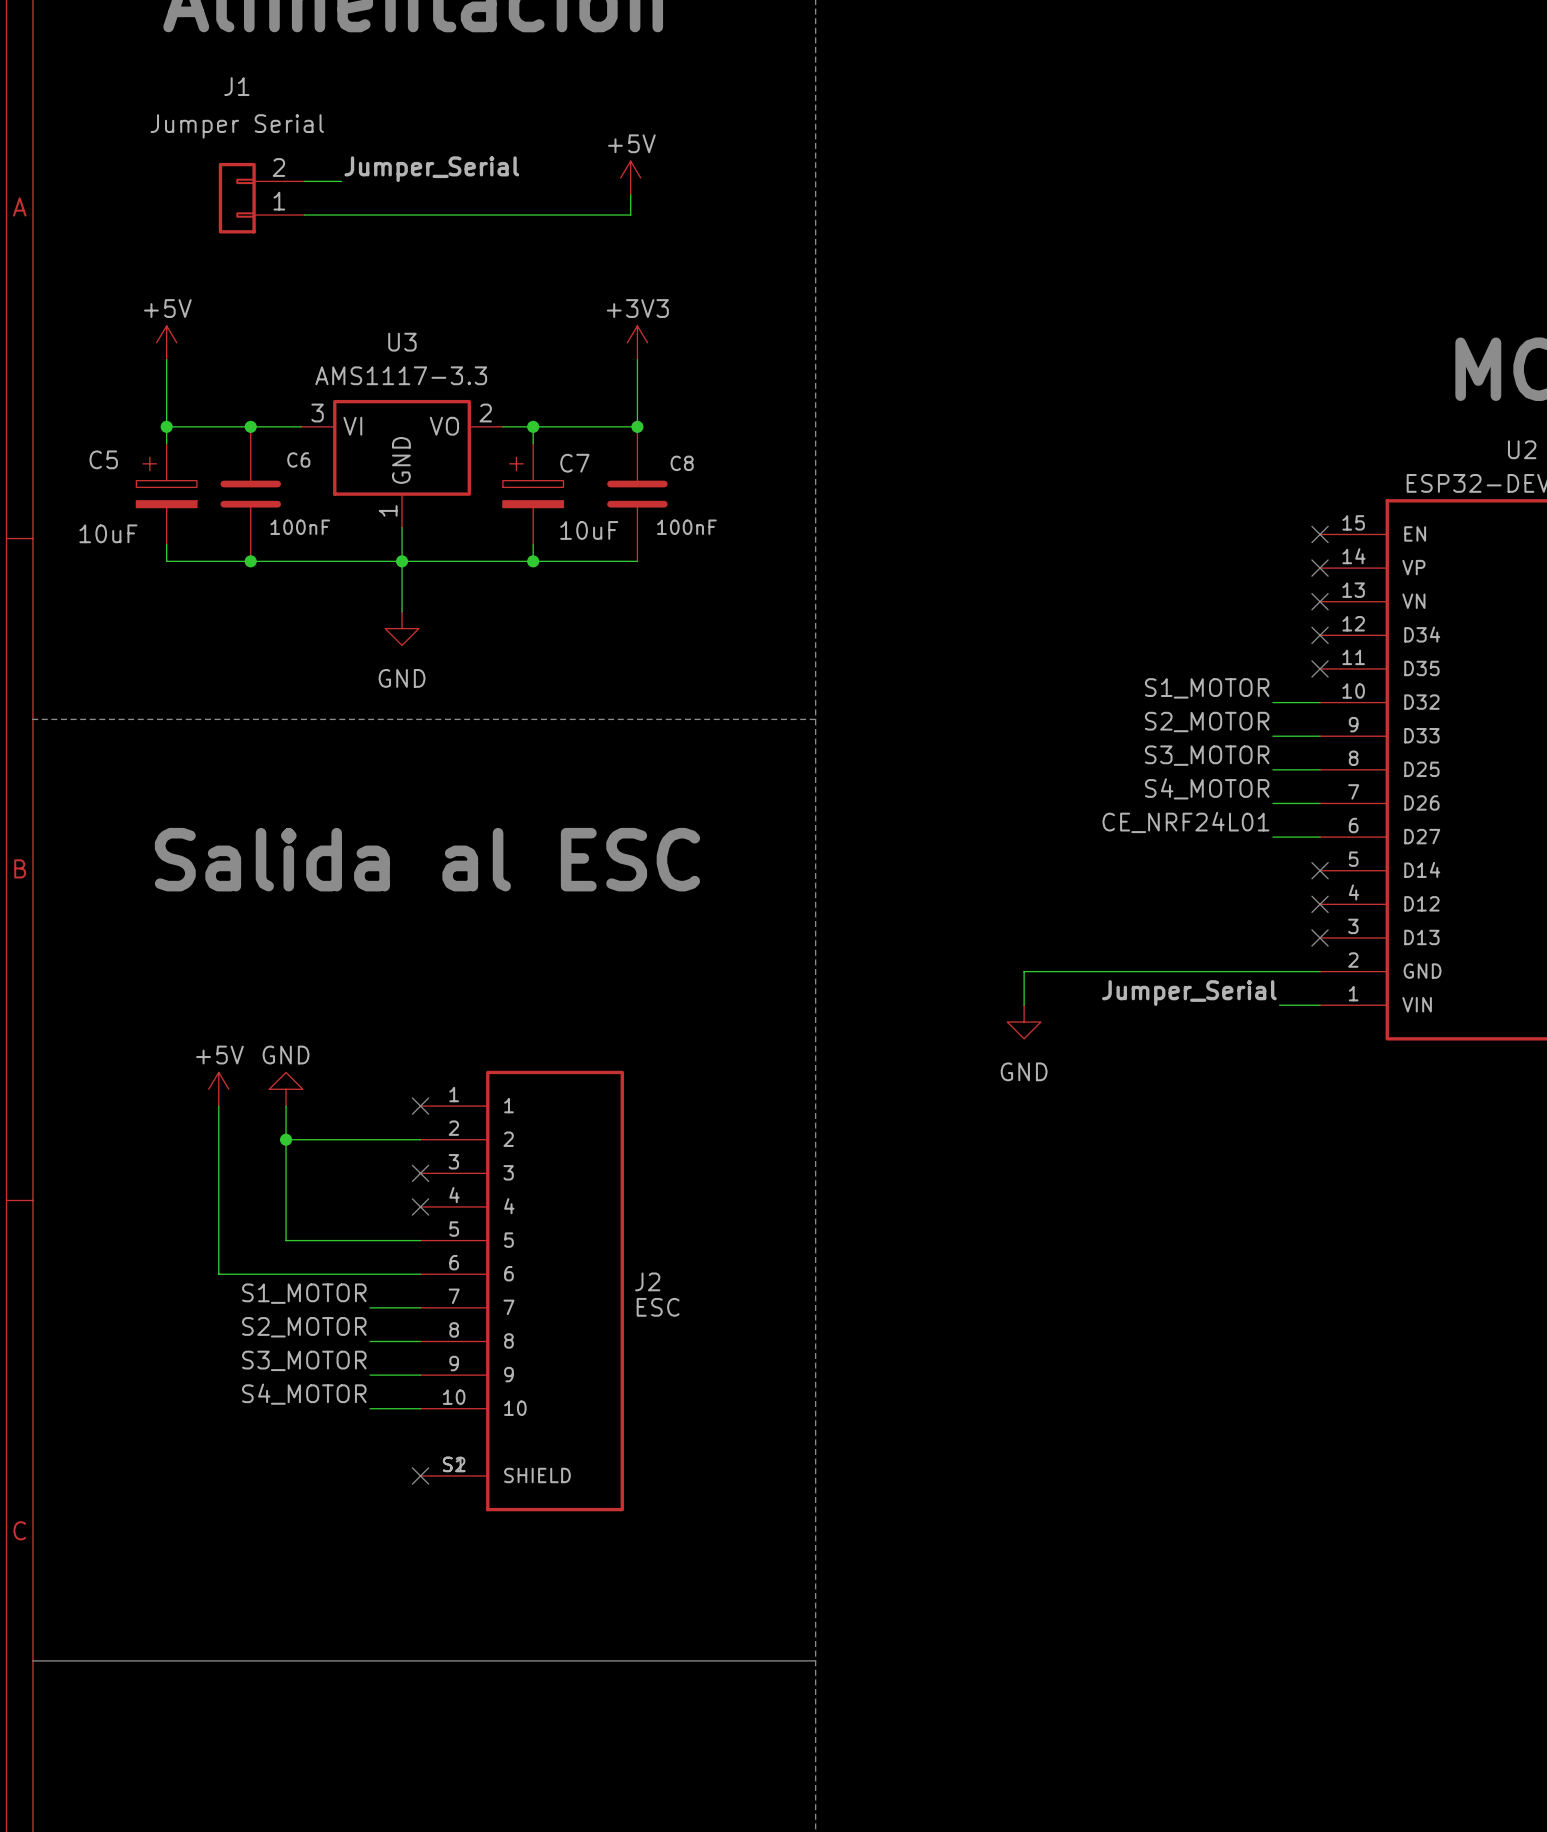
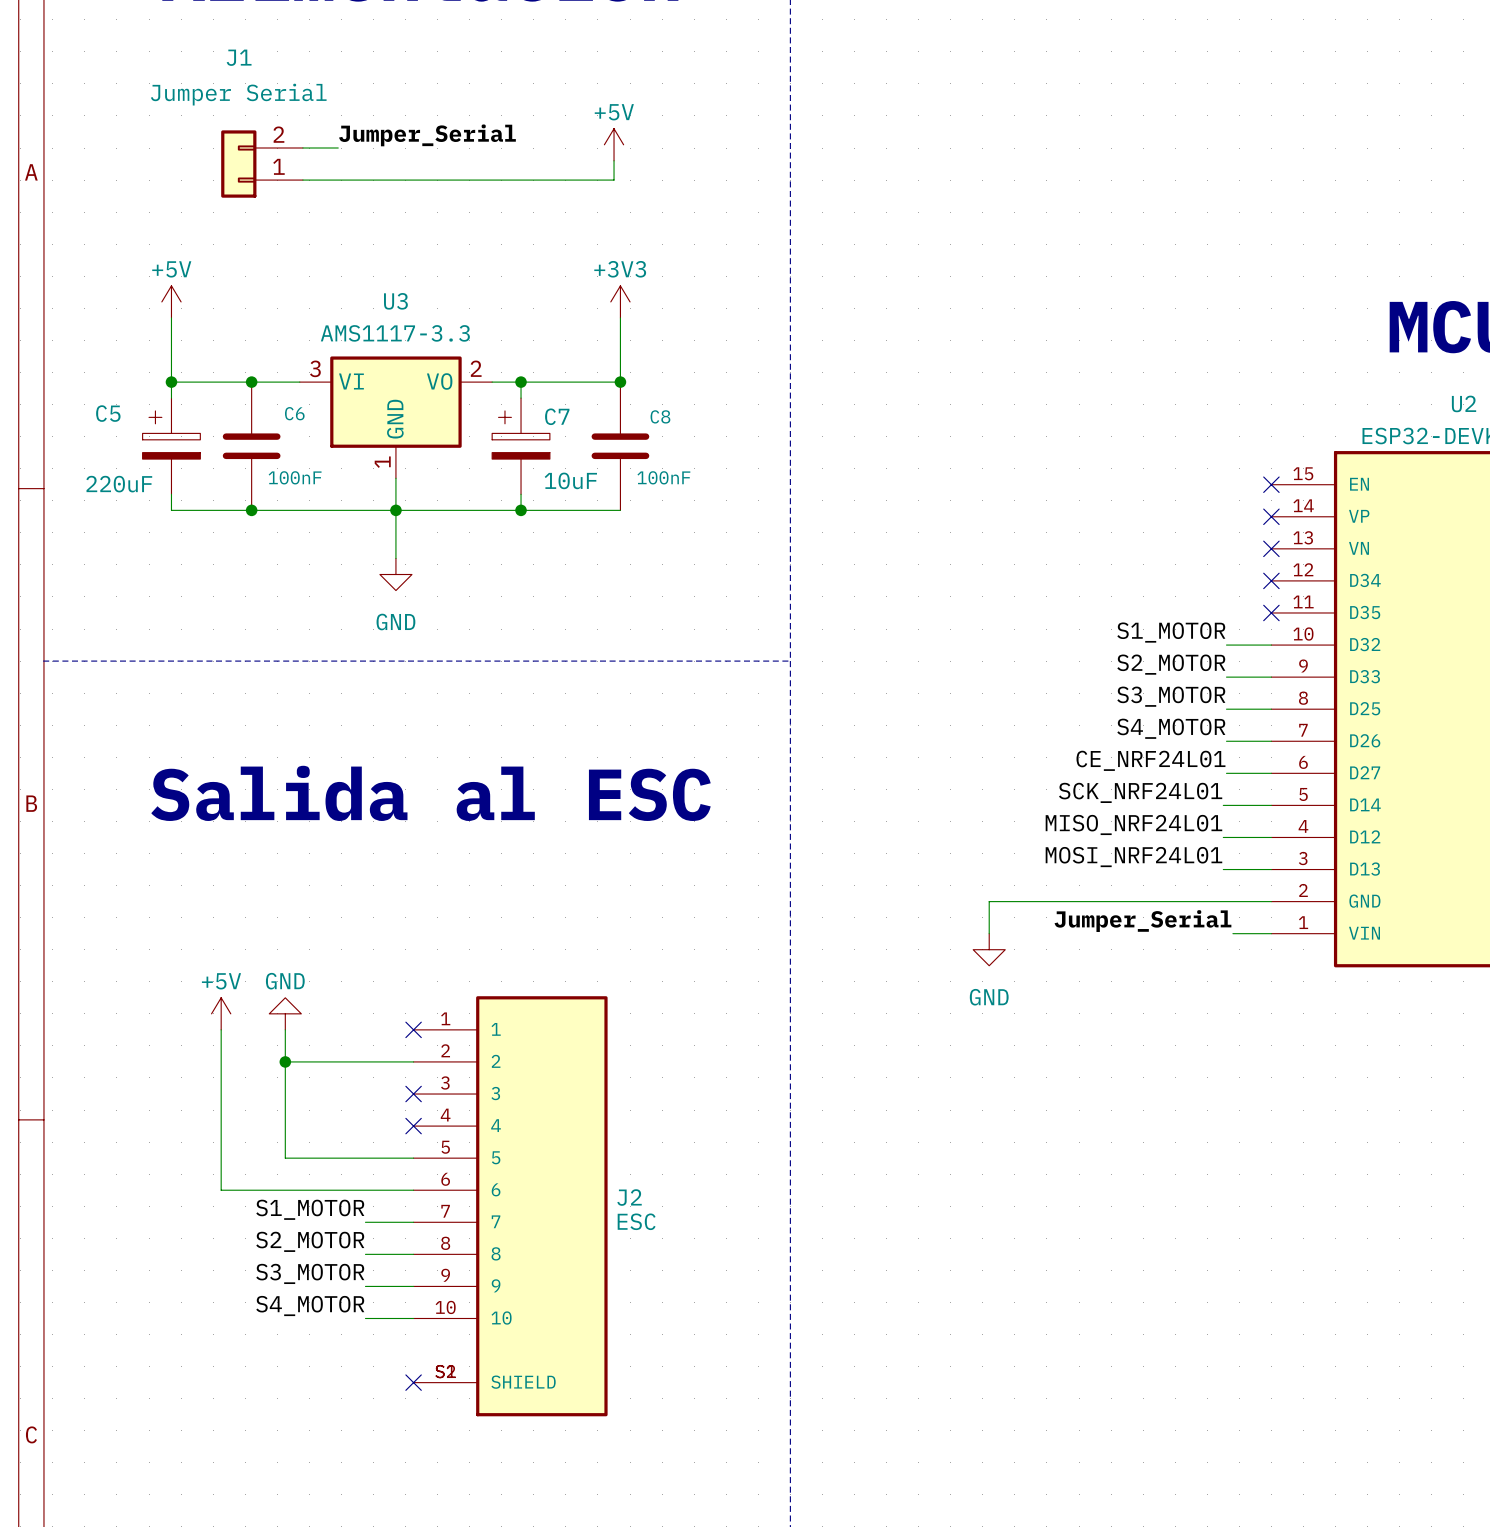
C5 value: 10uF (108, 533) -> 220uF (119, 484)
label: none -> SCK_NRF24L01 (1140, 792)
wire: none -> (1223, 805) (1271, 805)
no-connect mark: (1320, 870) -> none
label: none -> MISO_NRF24L01 (1133, 824)
wire: none -> (1223, 837) (1271, 837)
no-connect mark: (1320, 904) -> none
label: none -> MOSI_NRF24L01 (1133, 857)
wire: none -> (1223, 869) (1271, 869)
no-connect mark: (1320, 937) -> none

